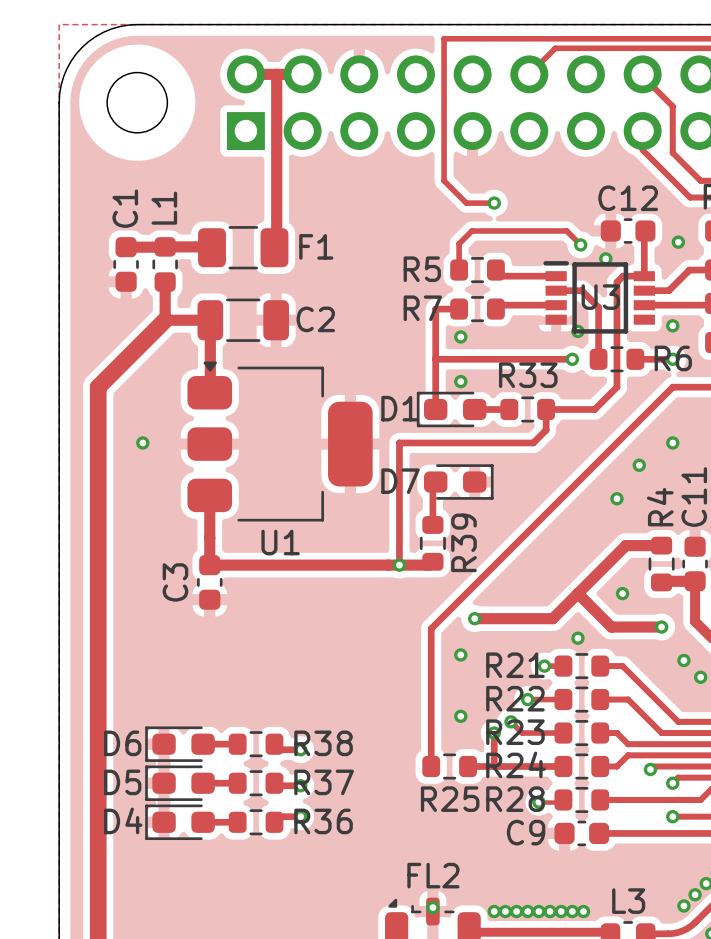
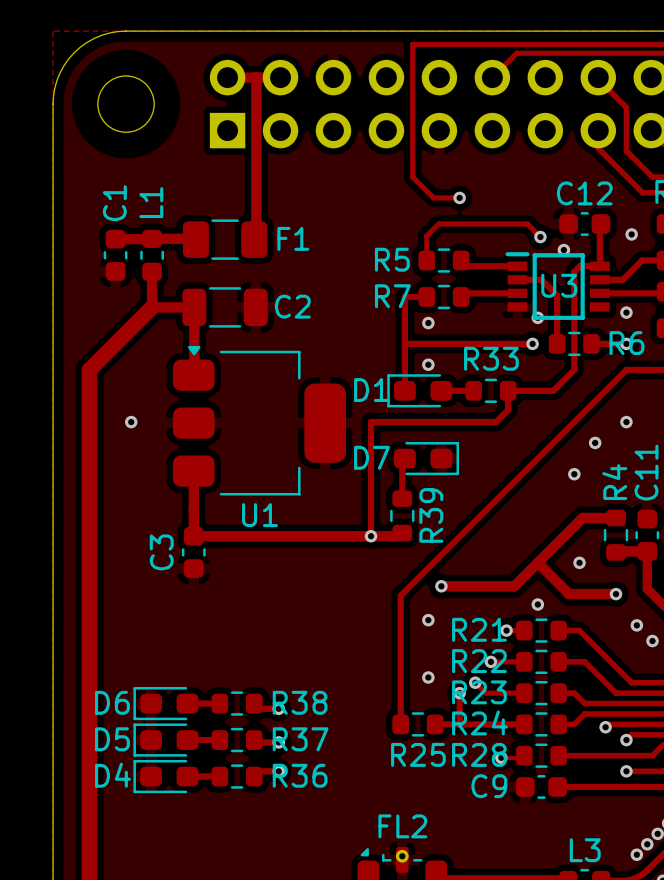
via: (494, 911) -> none
via: (505, 911) -> none
via: (516, 911) -> none
via: (527, 911) -> none
via: (538, 911) -> none
via: (550, 911) -> none
via: (561, 911) -> none
via: (572, 911) -> none
via: (583, 911) -> none

